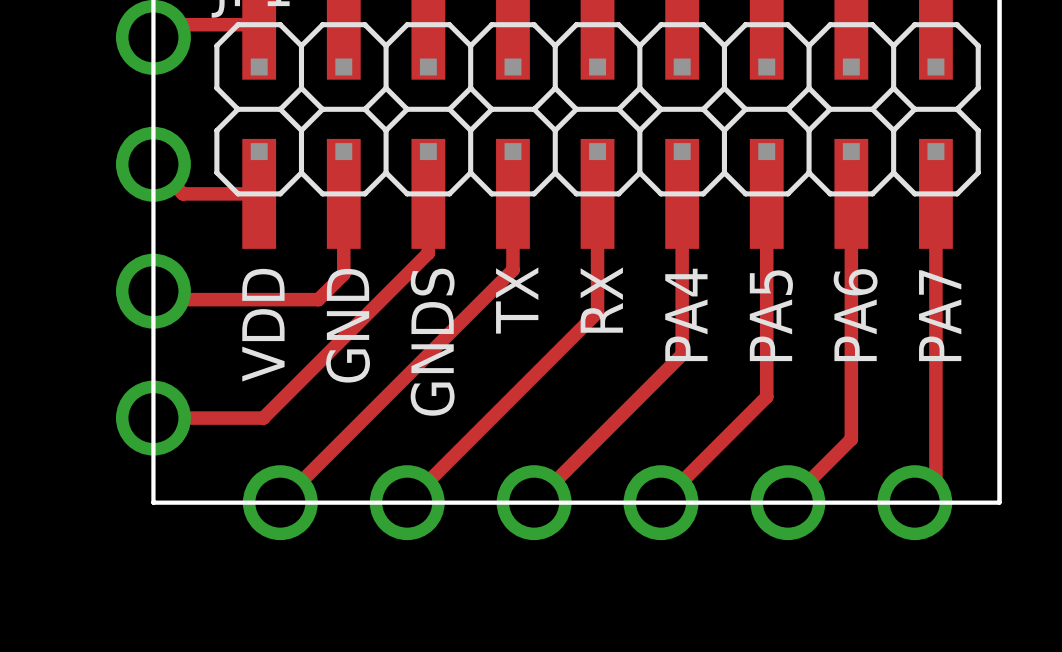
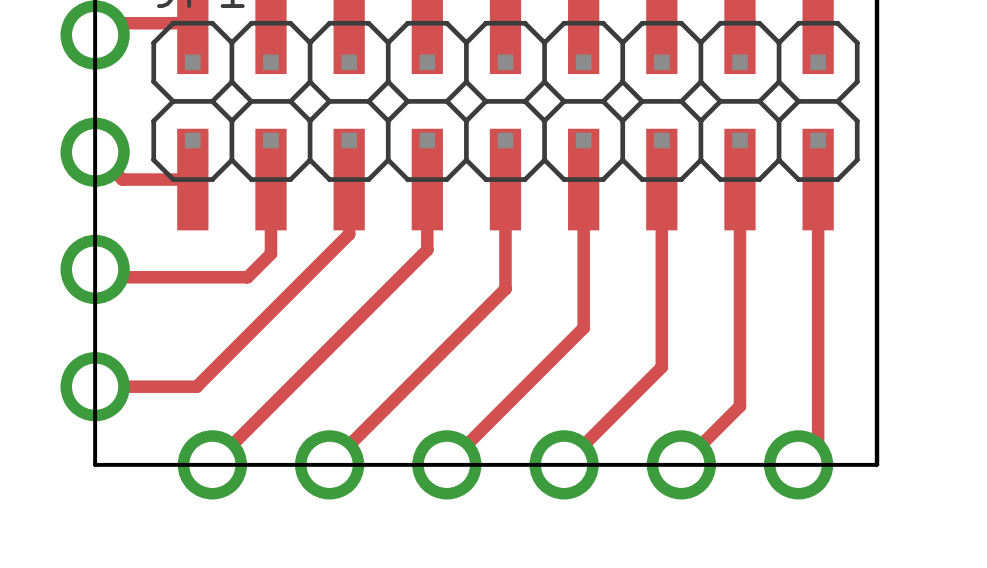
text: TX (517, 300) -> none
text: RX (601, 300) -> none
text: PA4 (686, 314) -> none
text: PA5 (771, 315) -> none
text: PA6 (855, 315) -> none
text: PA7 (940, 315) -> none
text: VDD (263, 325) -> none
text: GND (348, 325) -> none
text: GNDS (432, 342) -> none

